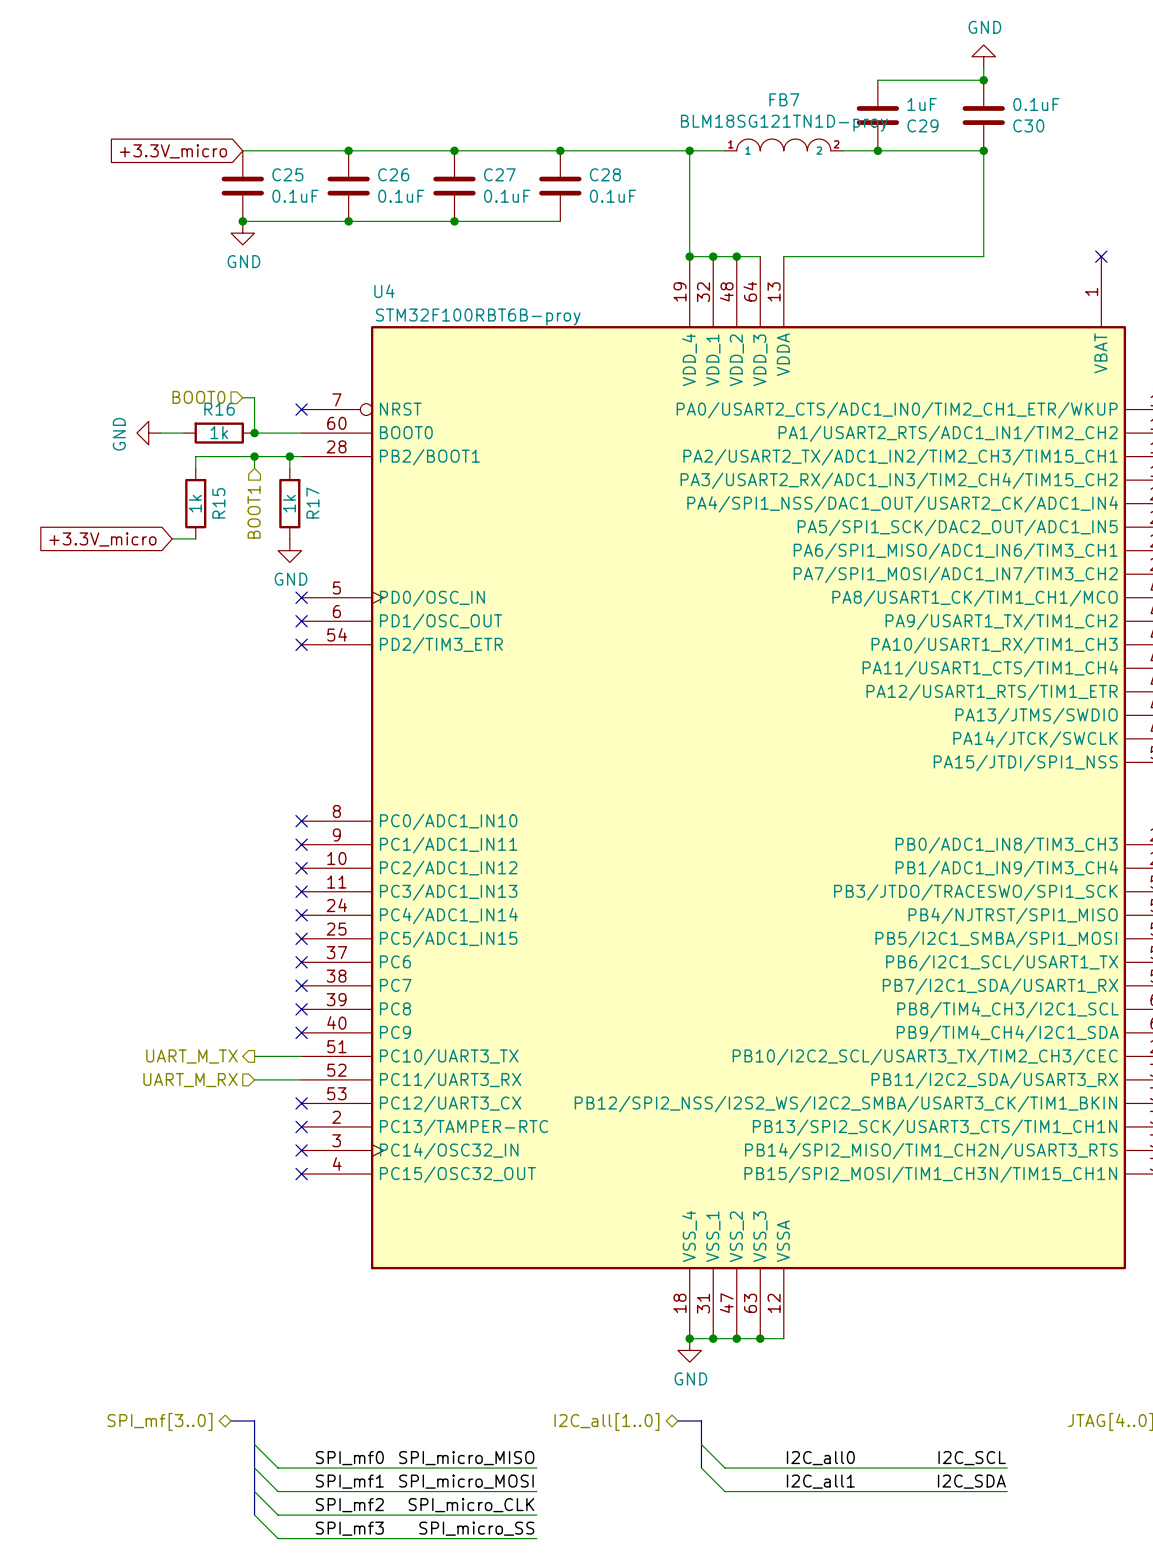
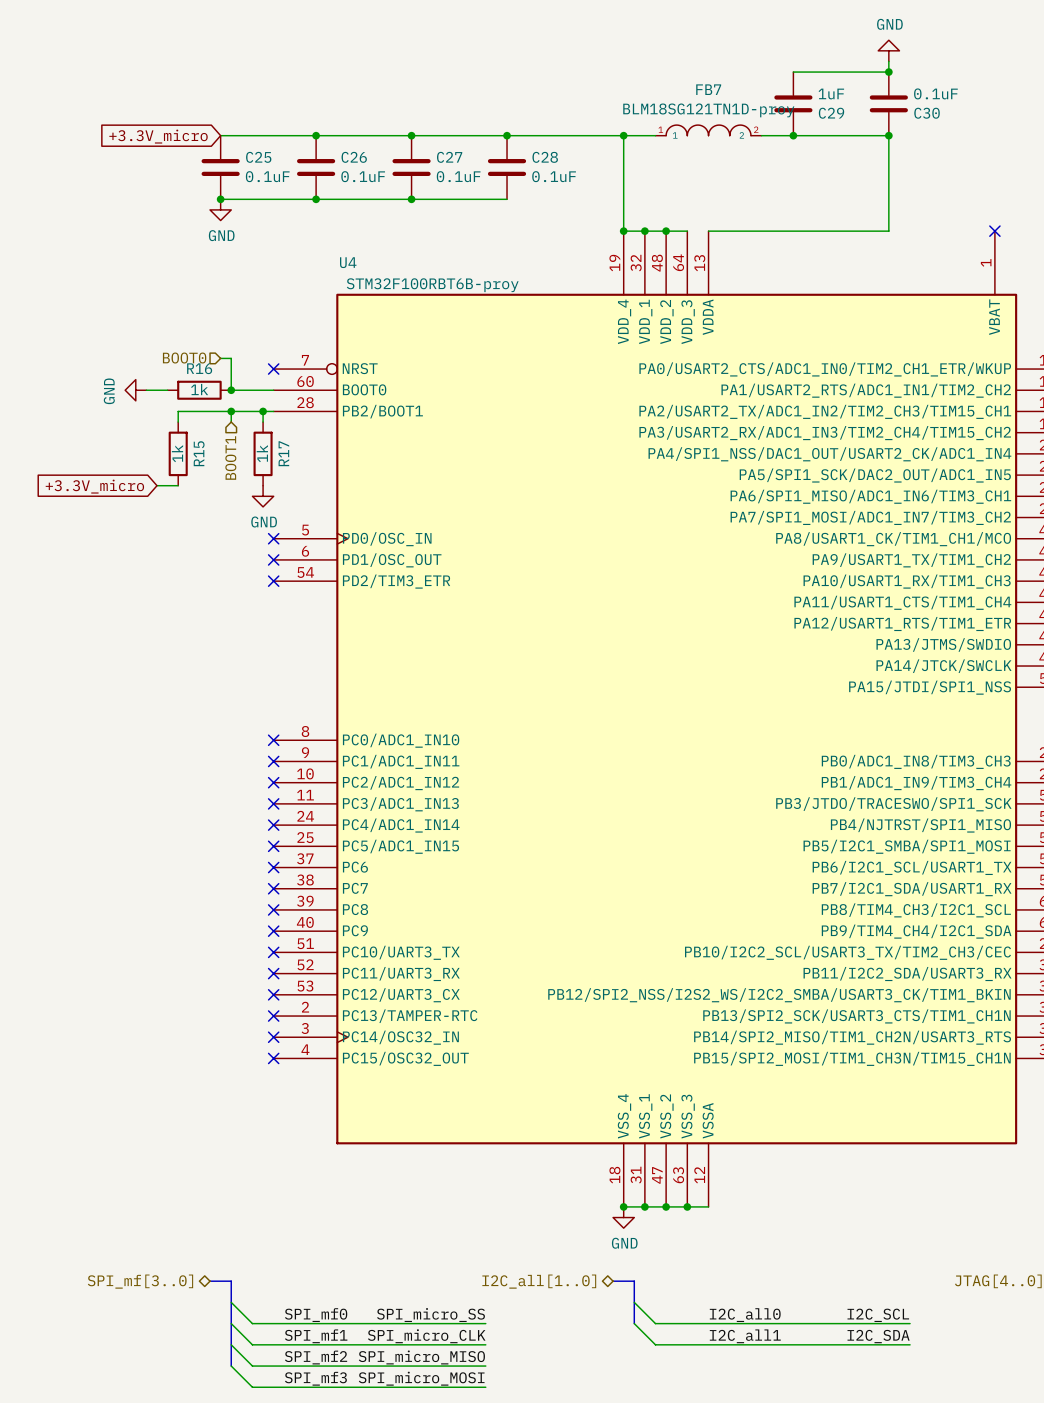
hierarchical label: UART_M_TX (191, 1056) -> none
wire: (254, 1056) (301, 1056) -> none
no-connect mark: none -> (273, 952)
wire: (254, 1079) (301, 1079) -> none
no-connect mark: none -> (273, 973)
hierarchical label: UART_M_RX (190, 1080) -> none
label: SPI_micro_MISO (466, 1458) -> SPI_micro_SS (430, 1315)
label: SPI_micro_MOSI (466, 1481) -> SPI_micro_CLK (426, 1336)
label: SPI_micro_CLK (471, 1505) -> SPI_micro_MISO (421, 1357)
label: SPI_micro_SS (476, 1528) -> SPI_micro_MOSI (421, 1378)

